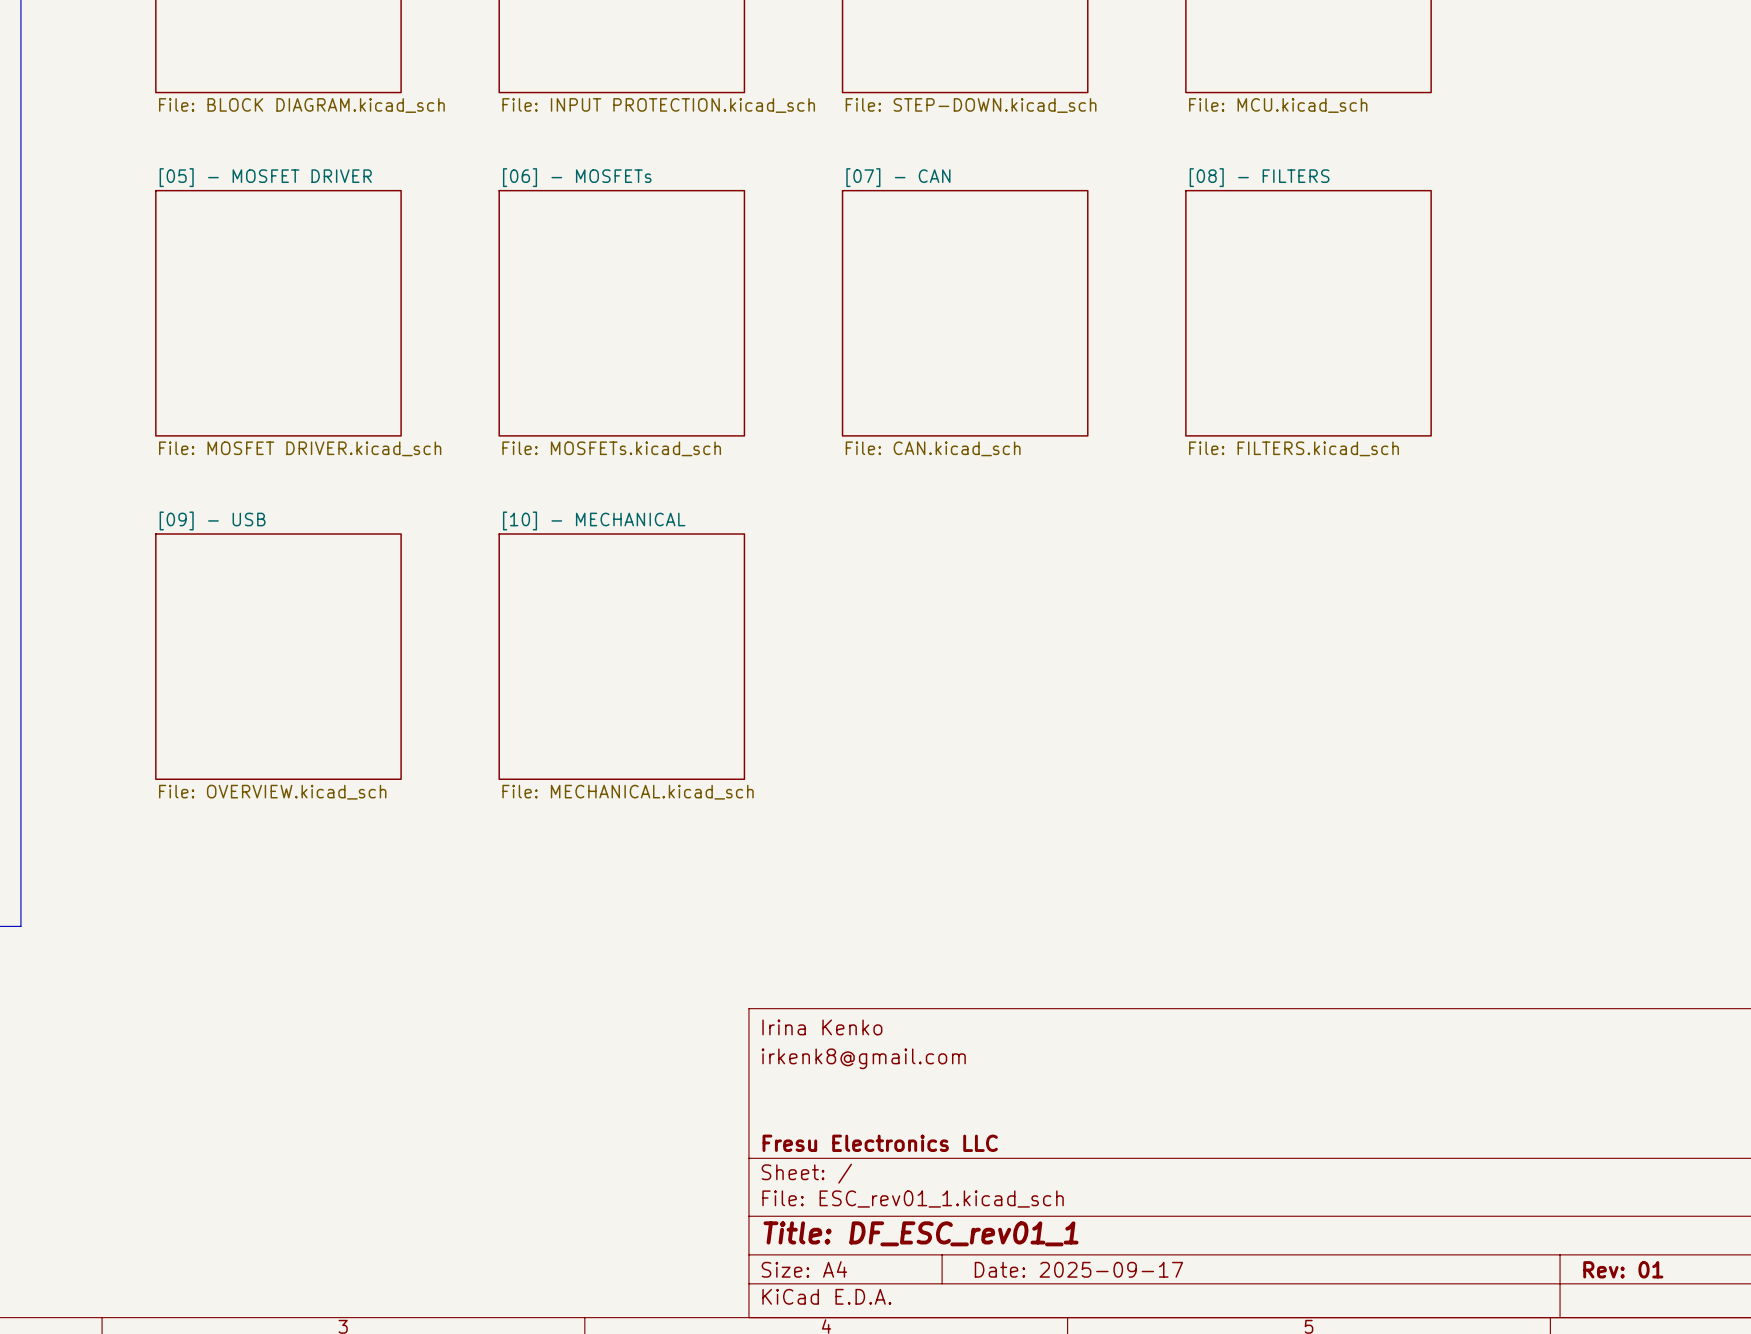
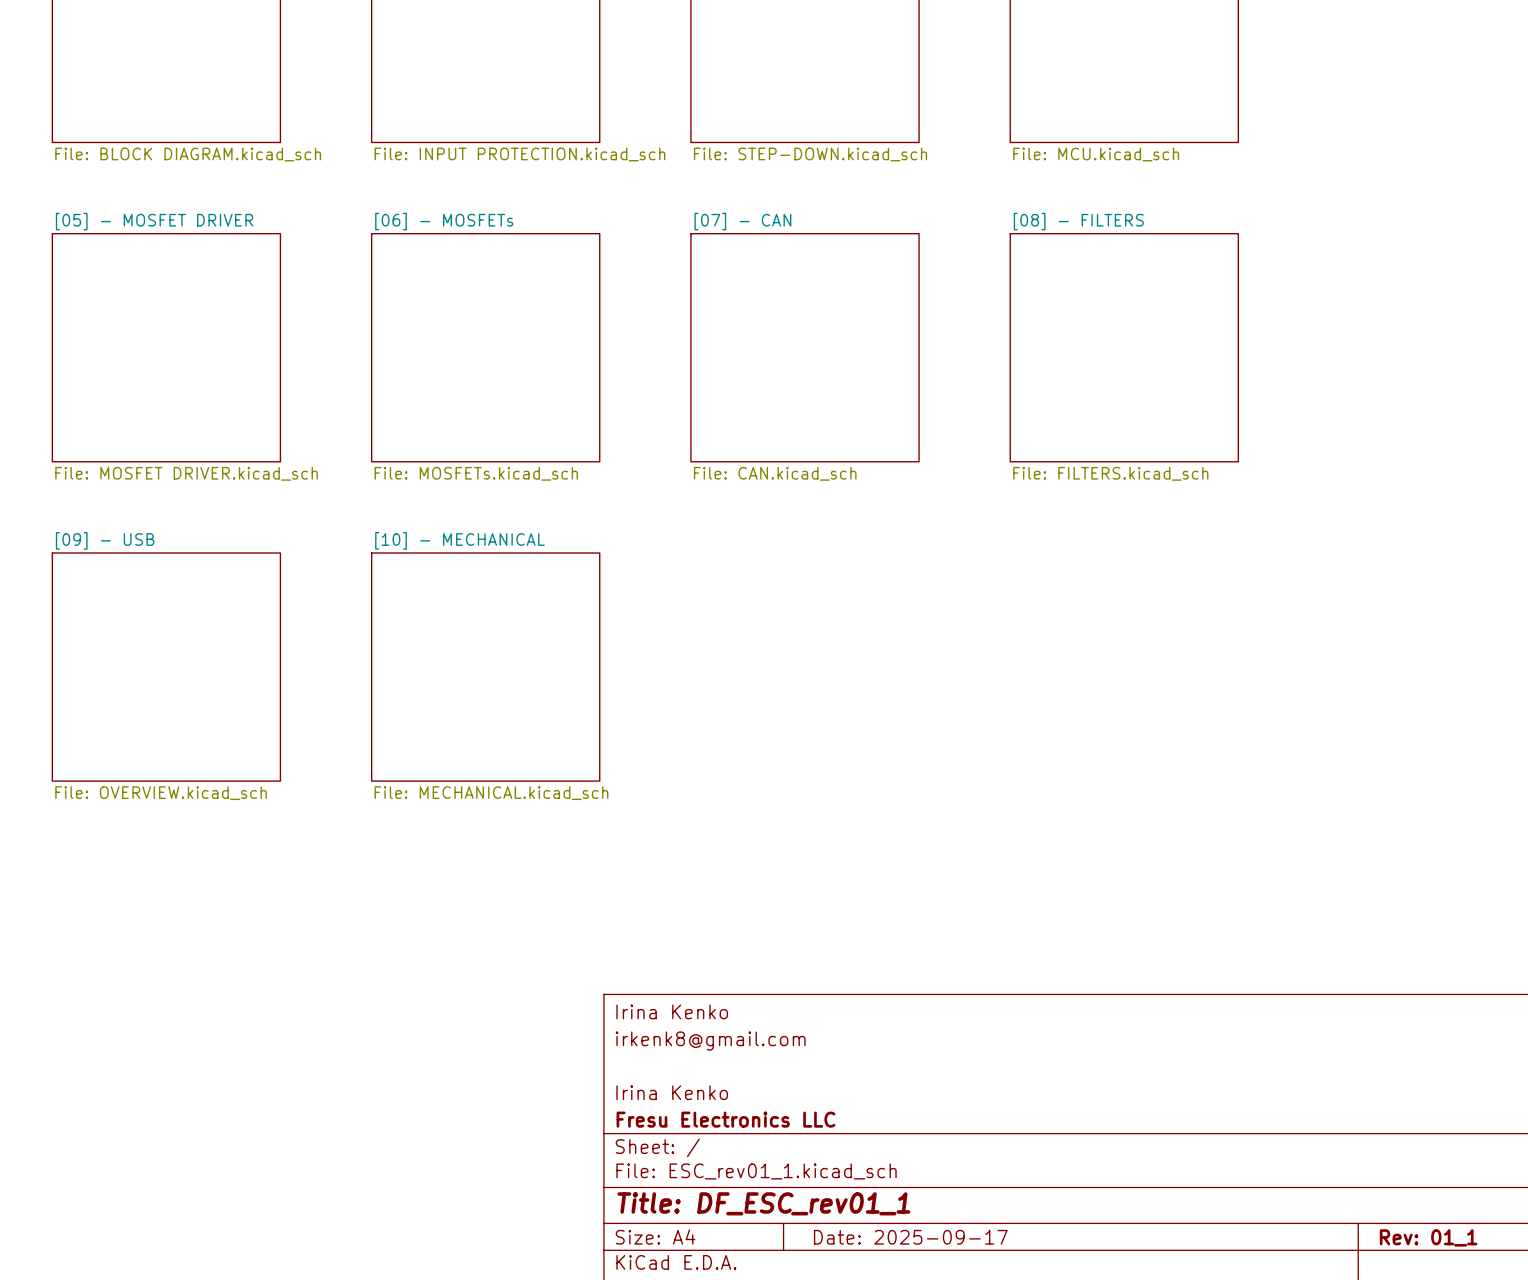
title block: none -> Irina Kenko (672, 1092)
title block: Rev: 01 (1623, 1269) -> Rev: 01_1 (1428, 1237)

